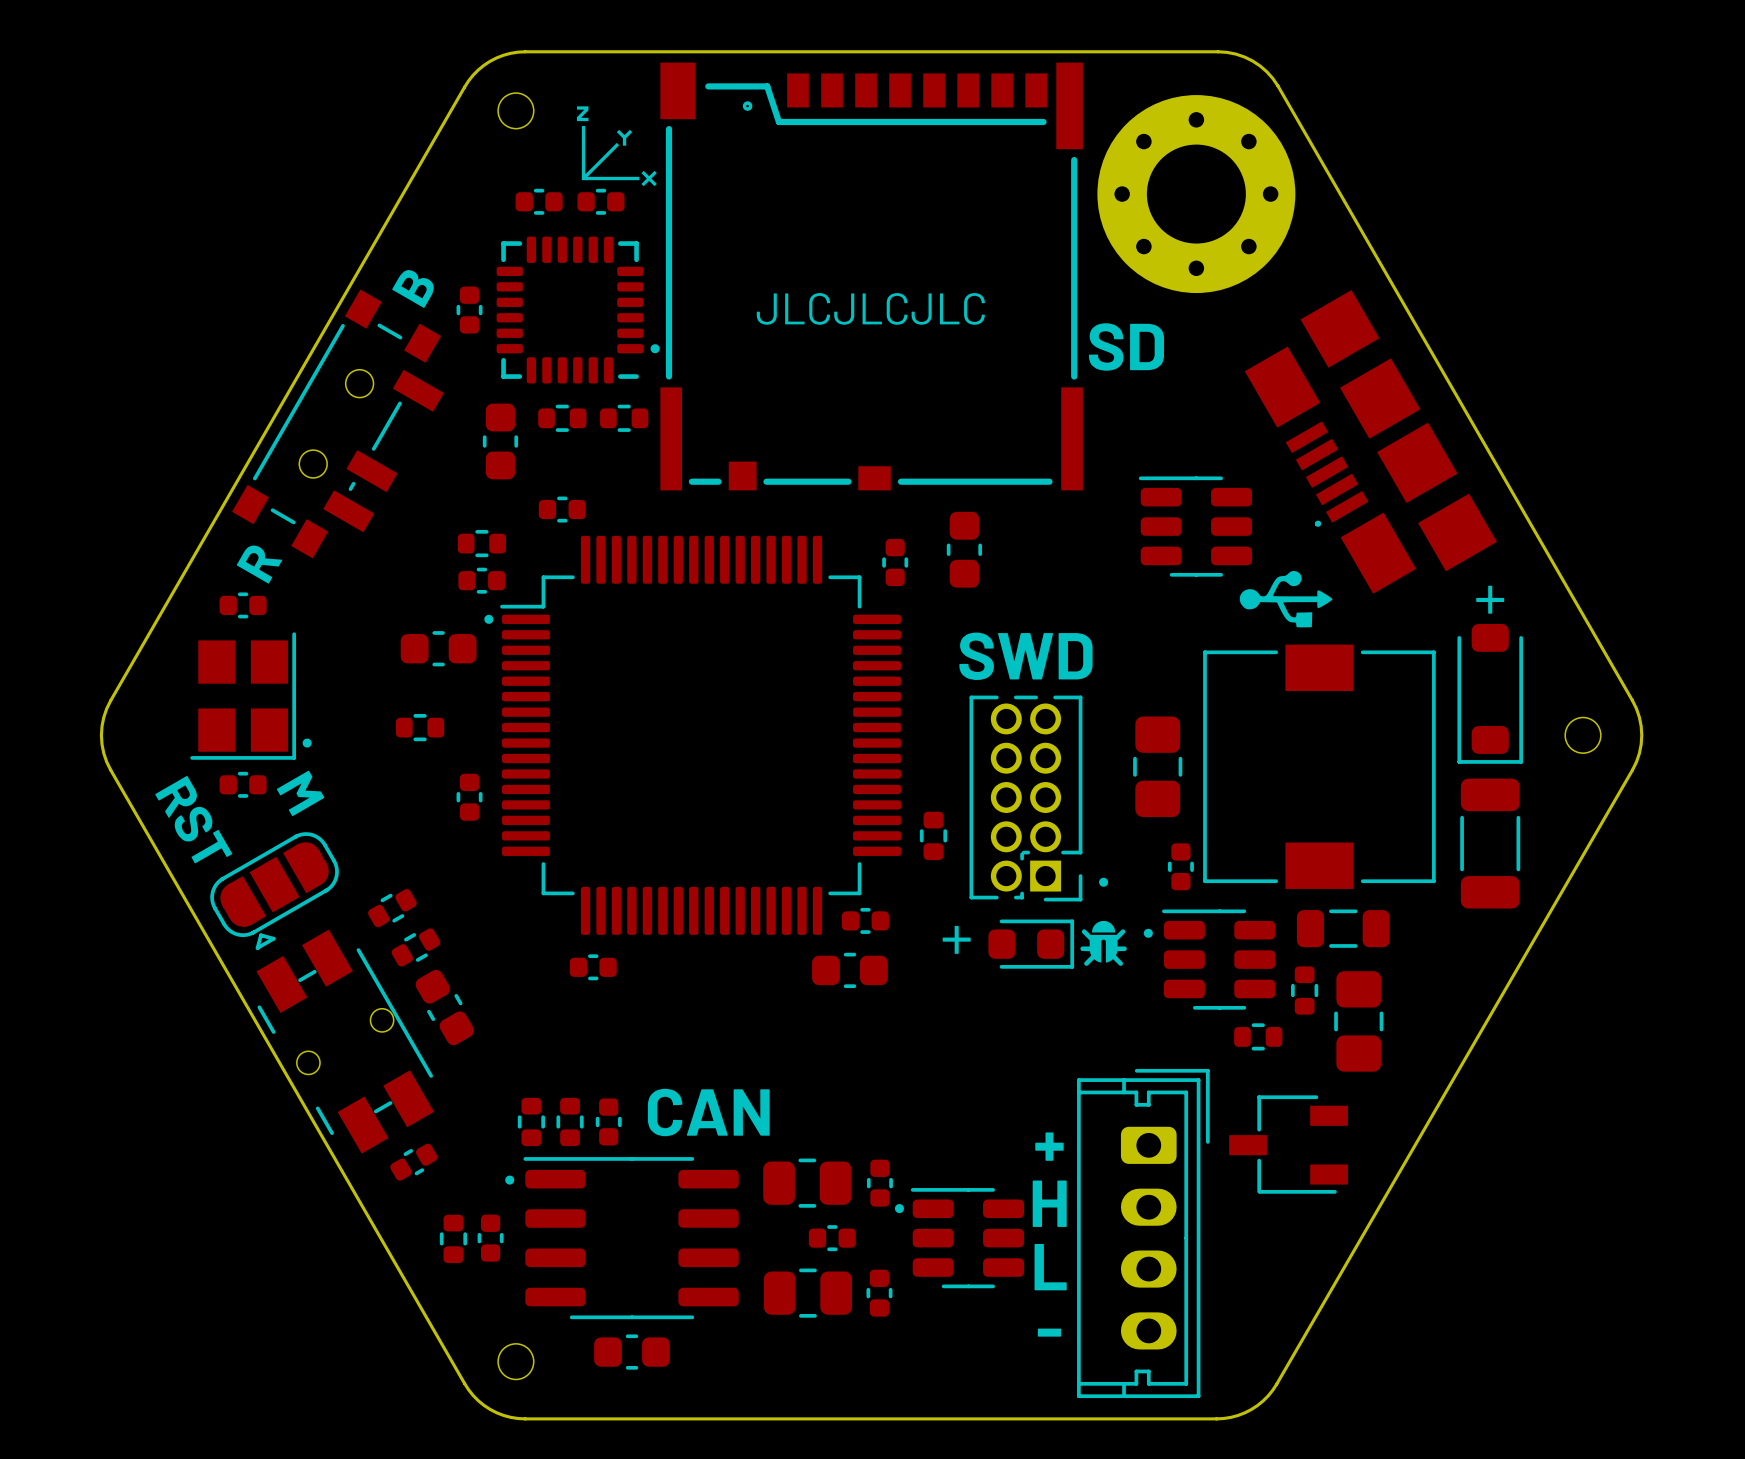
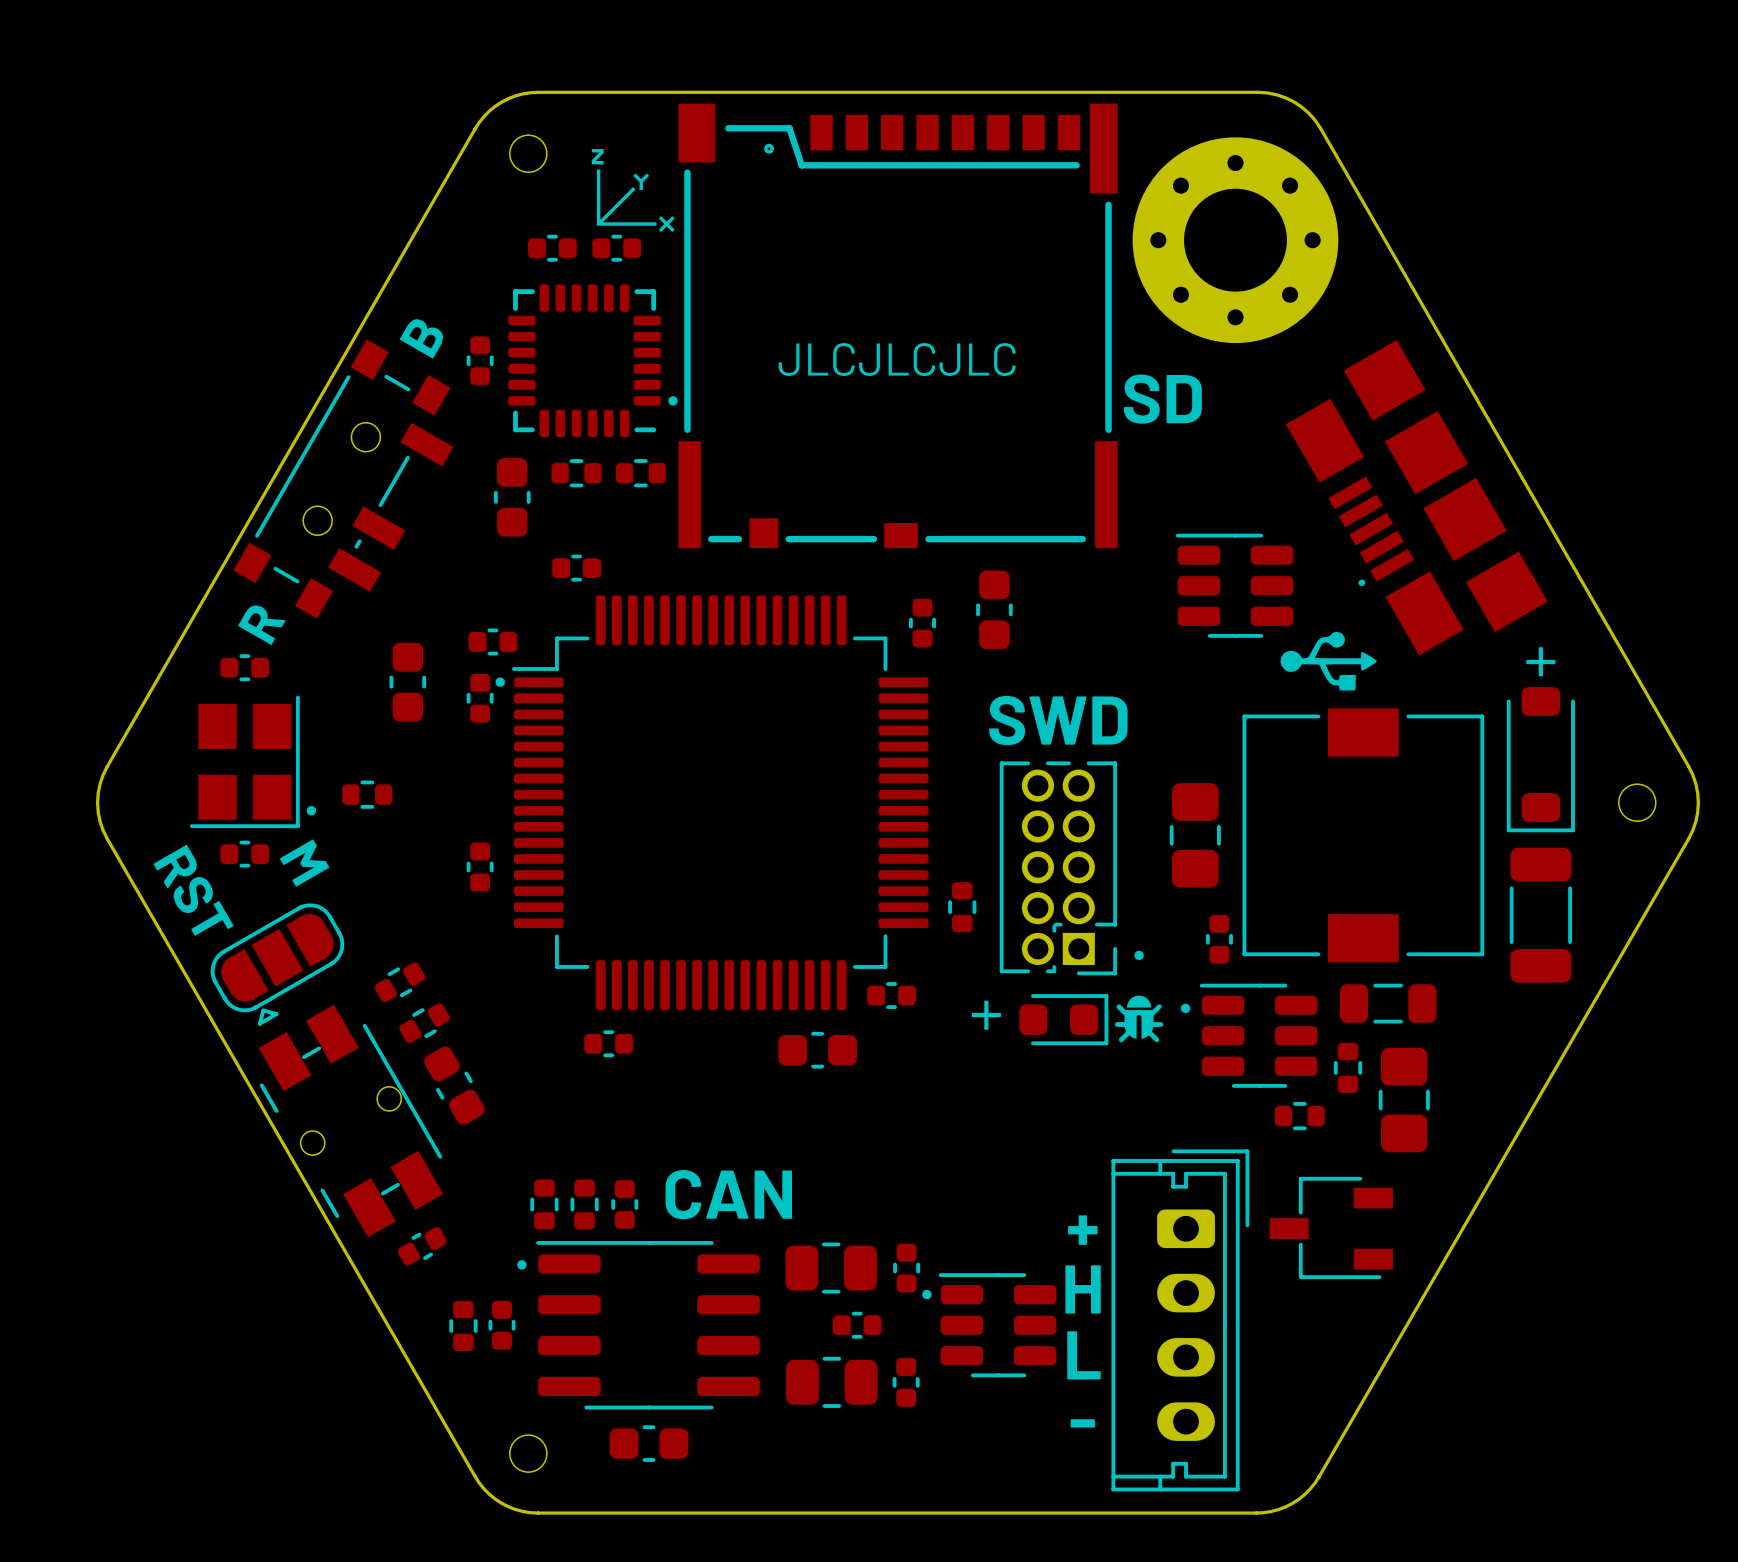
part: (481, 543) -> none
part: none -> (480, 698)
part rotation: 0° (438, 648) -> 90° clockwise (407, 682)
part position: (438, 648) -> (407, 682)
part position: (420, 727) -> (367, 794)
part position: (849, 970) -> (817, 1050)

